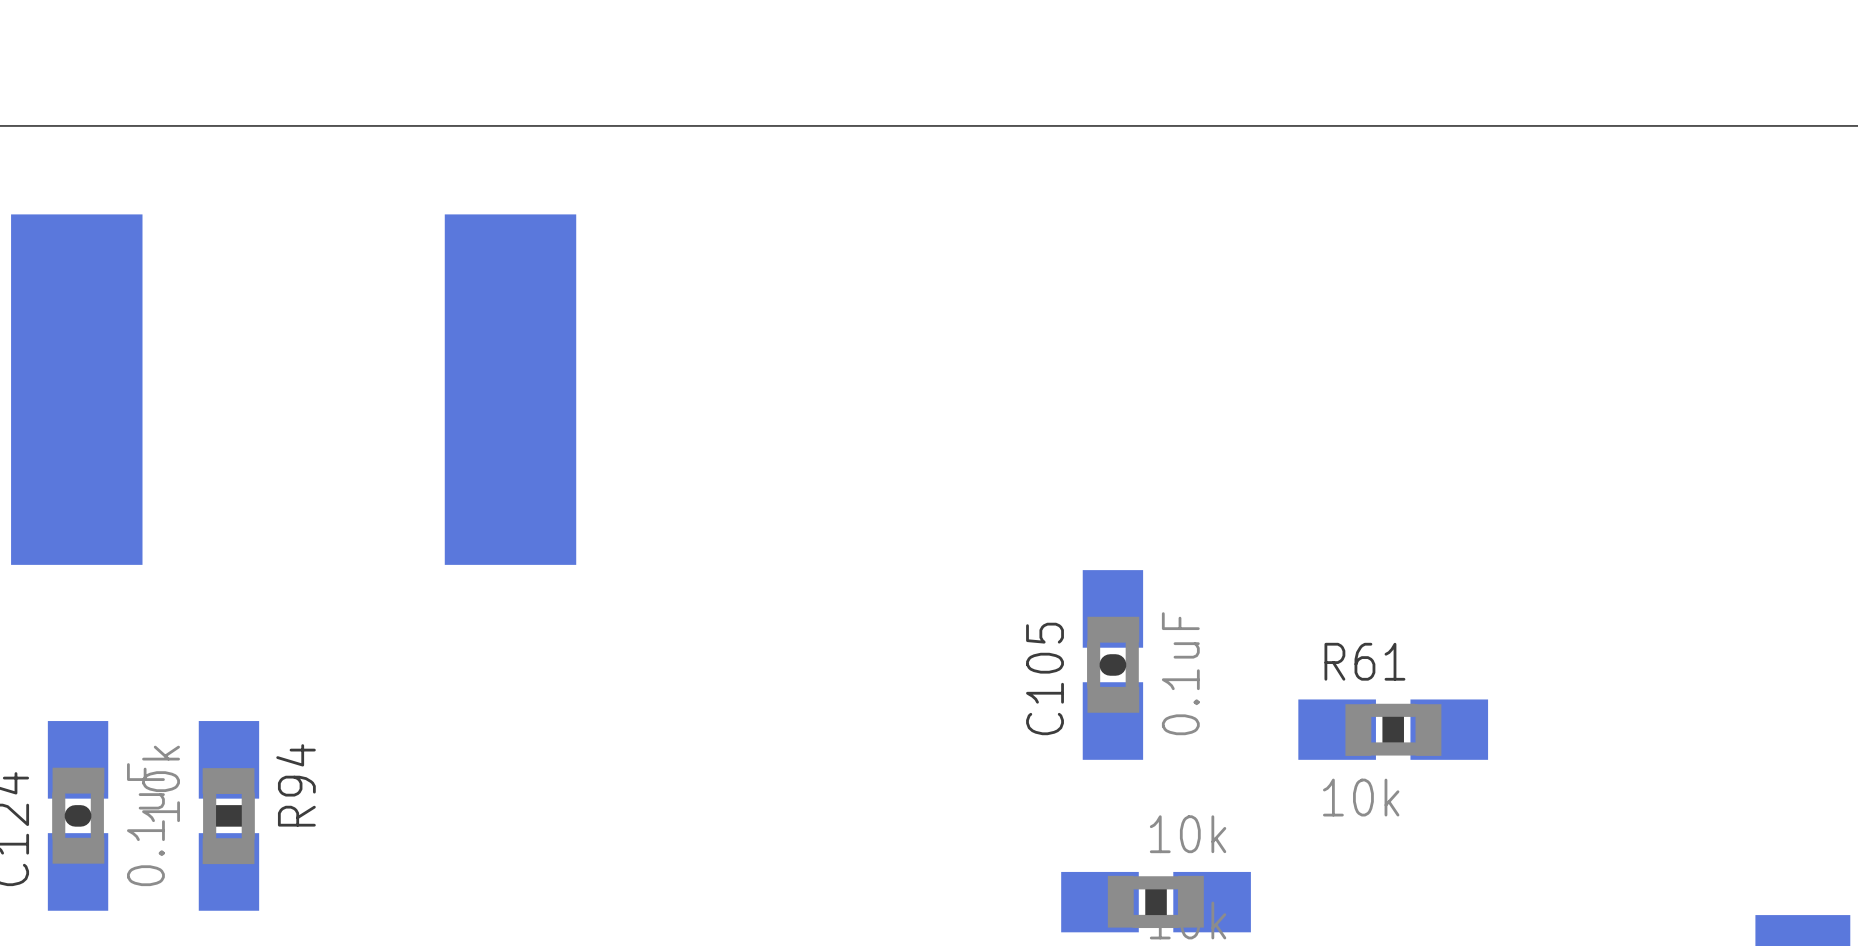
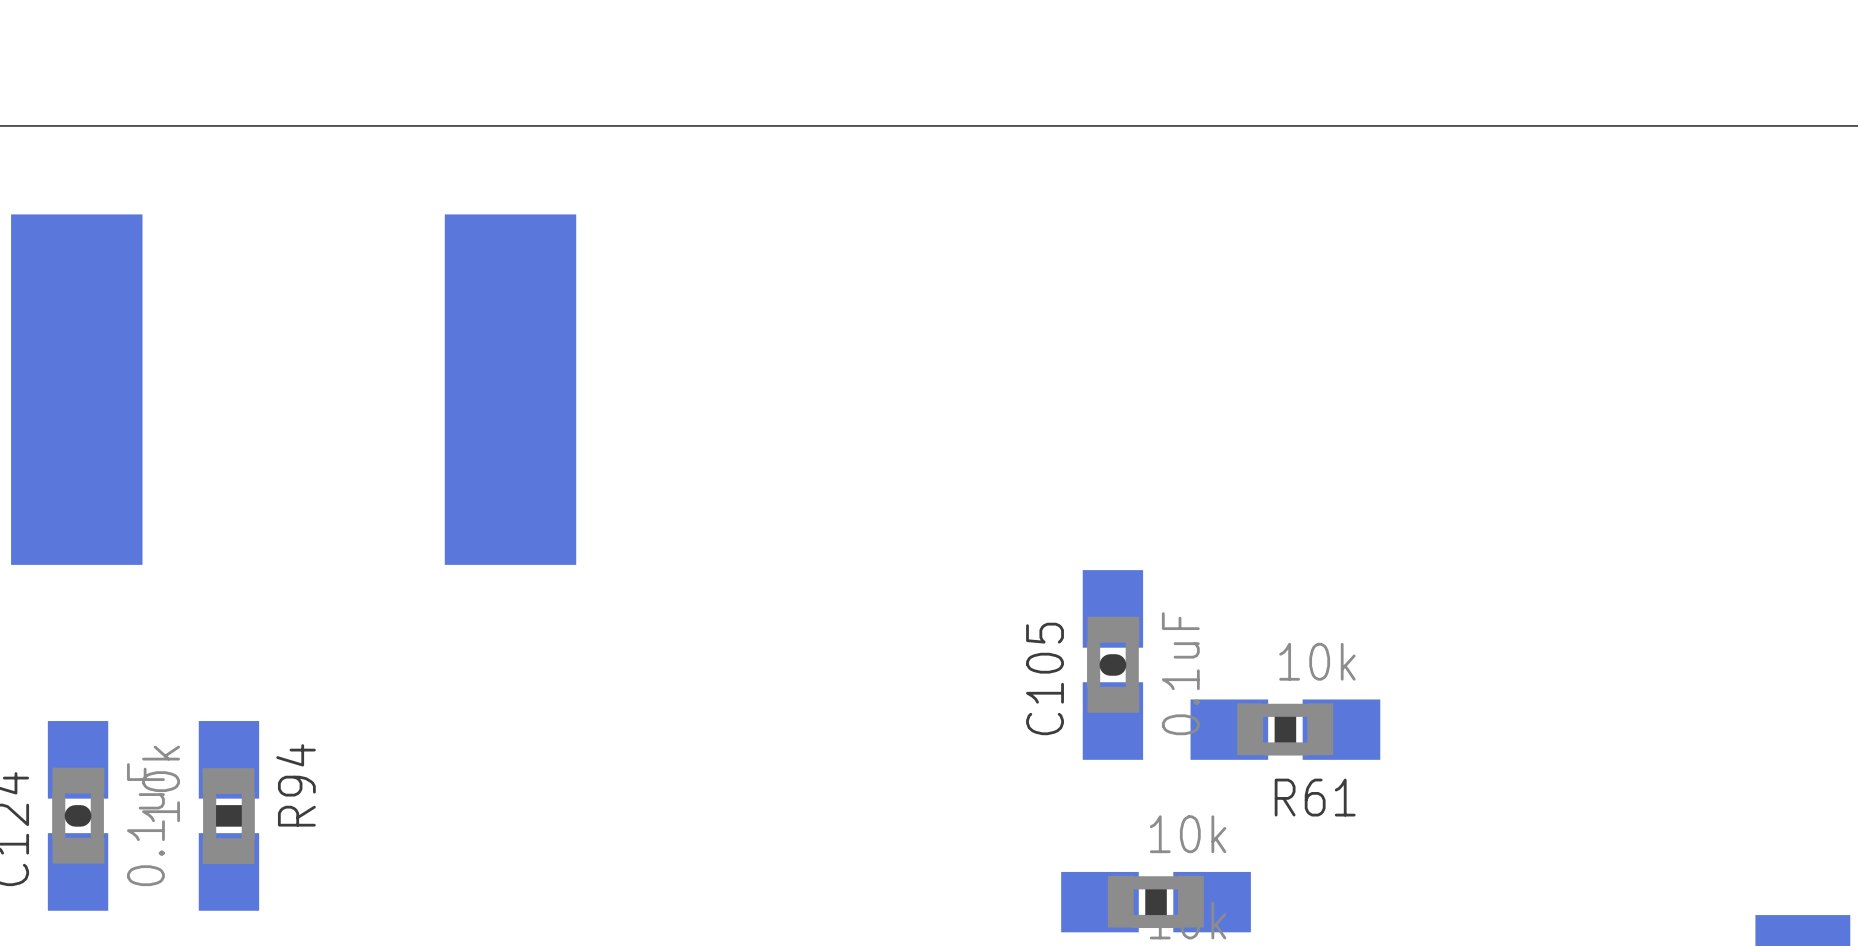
R61 name position: R61 (1364, 661) -> R61 (1315, 797)
R61 position: (1393, 729) -> (1285, 729)
R61 value position: 10k (1361, 797) -> 10k (1317, 661)

